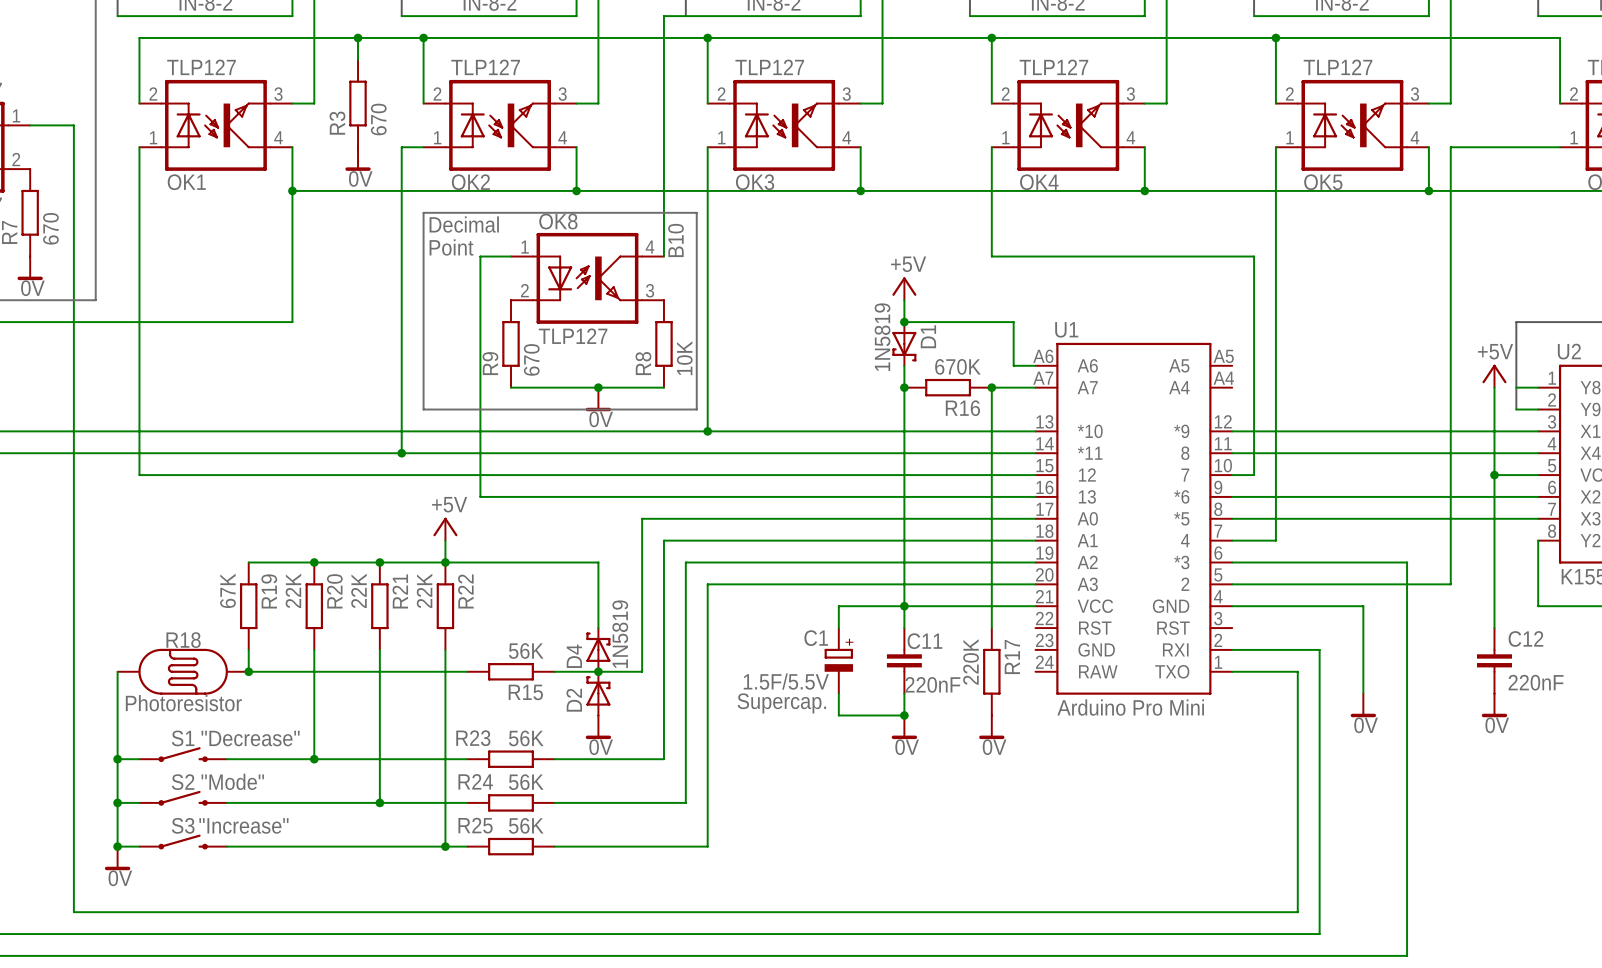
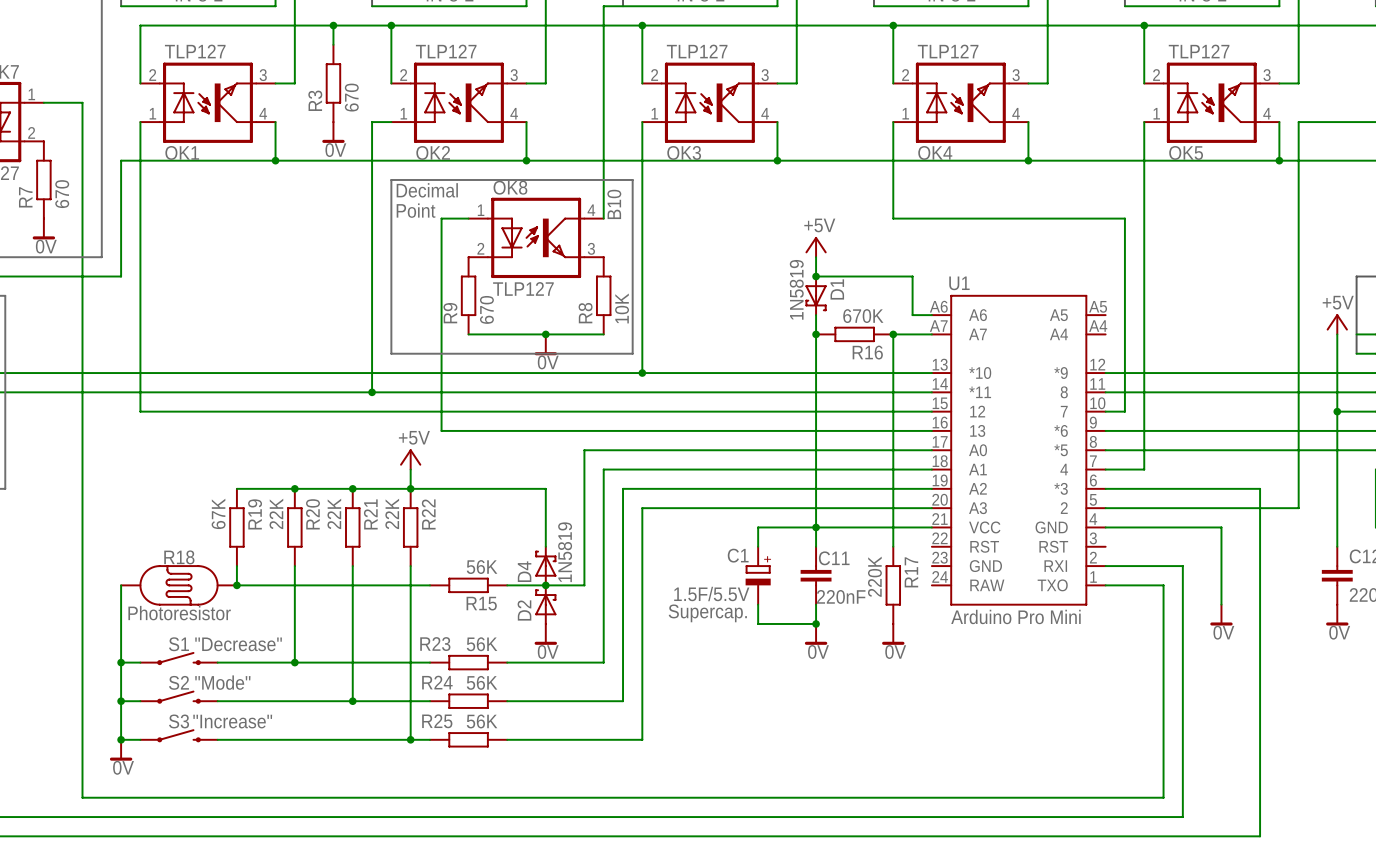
wire: (292, 190) (292, 322) (117, 322) -> (275, 160) (121, 160) (121, 276)

